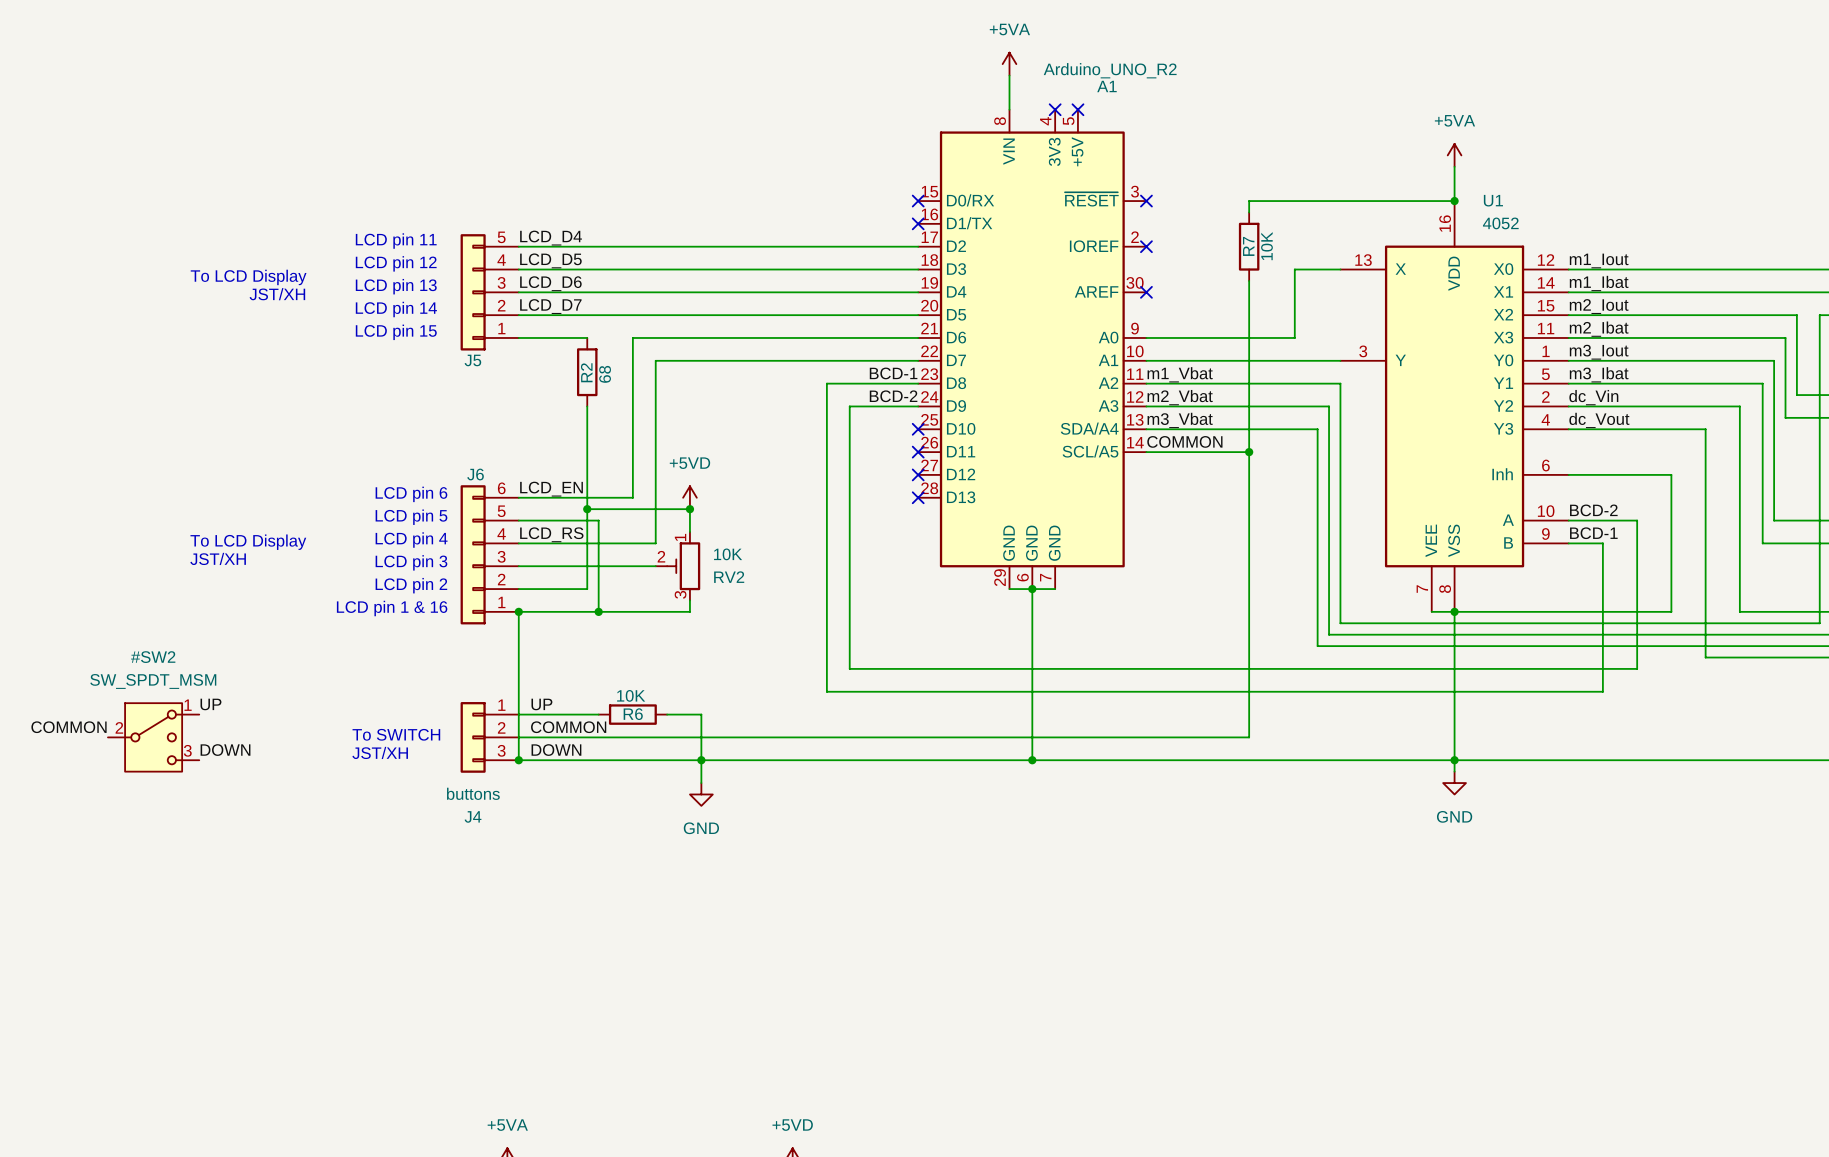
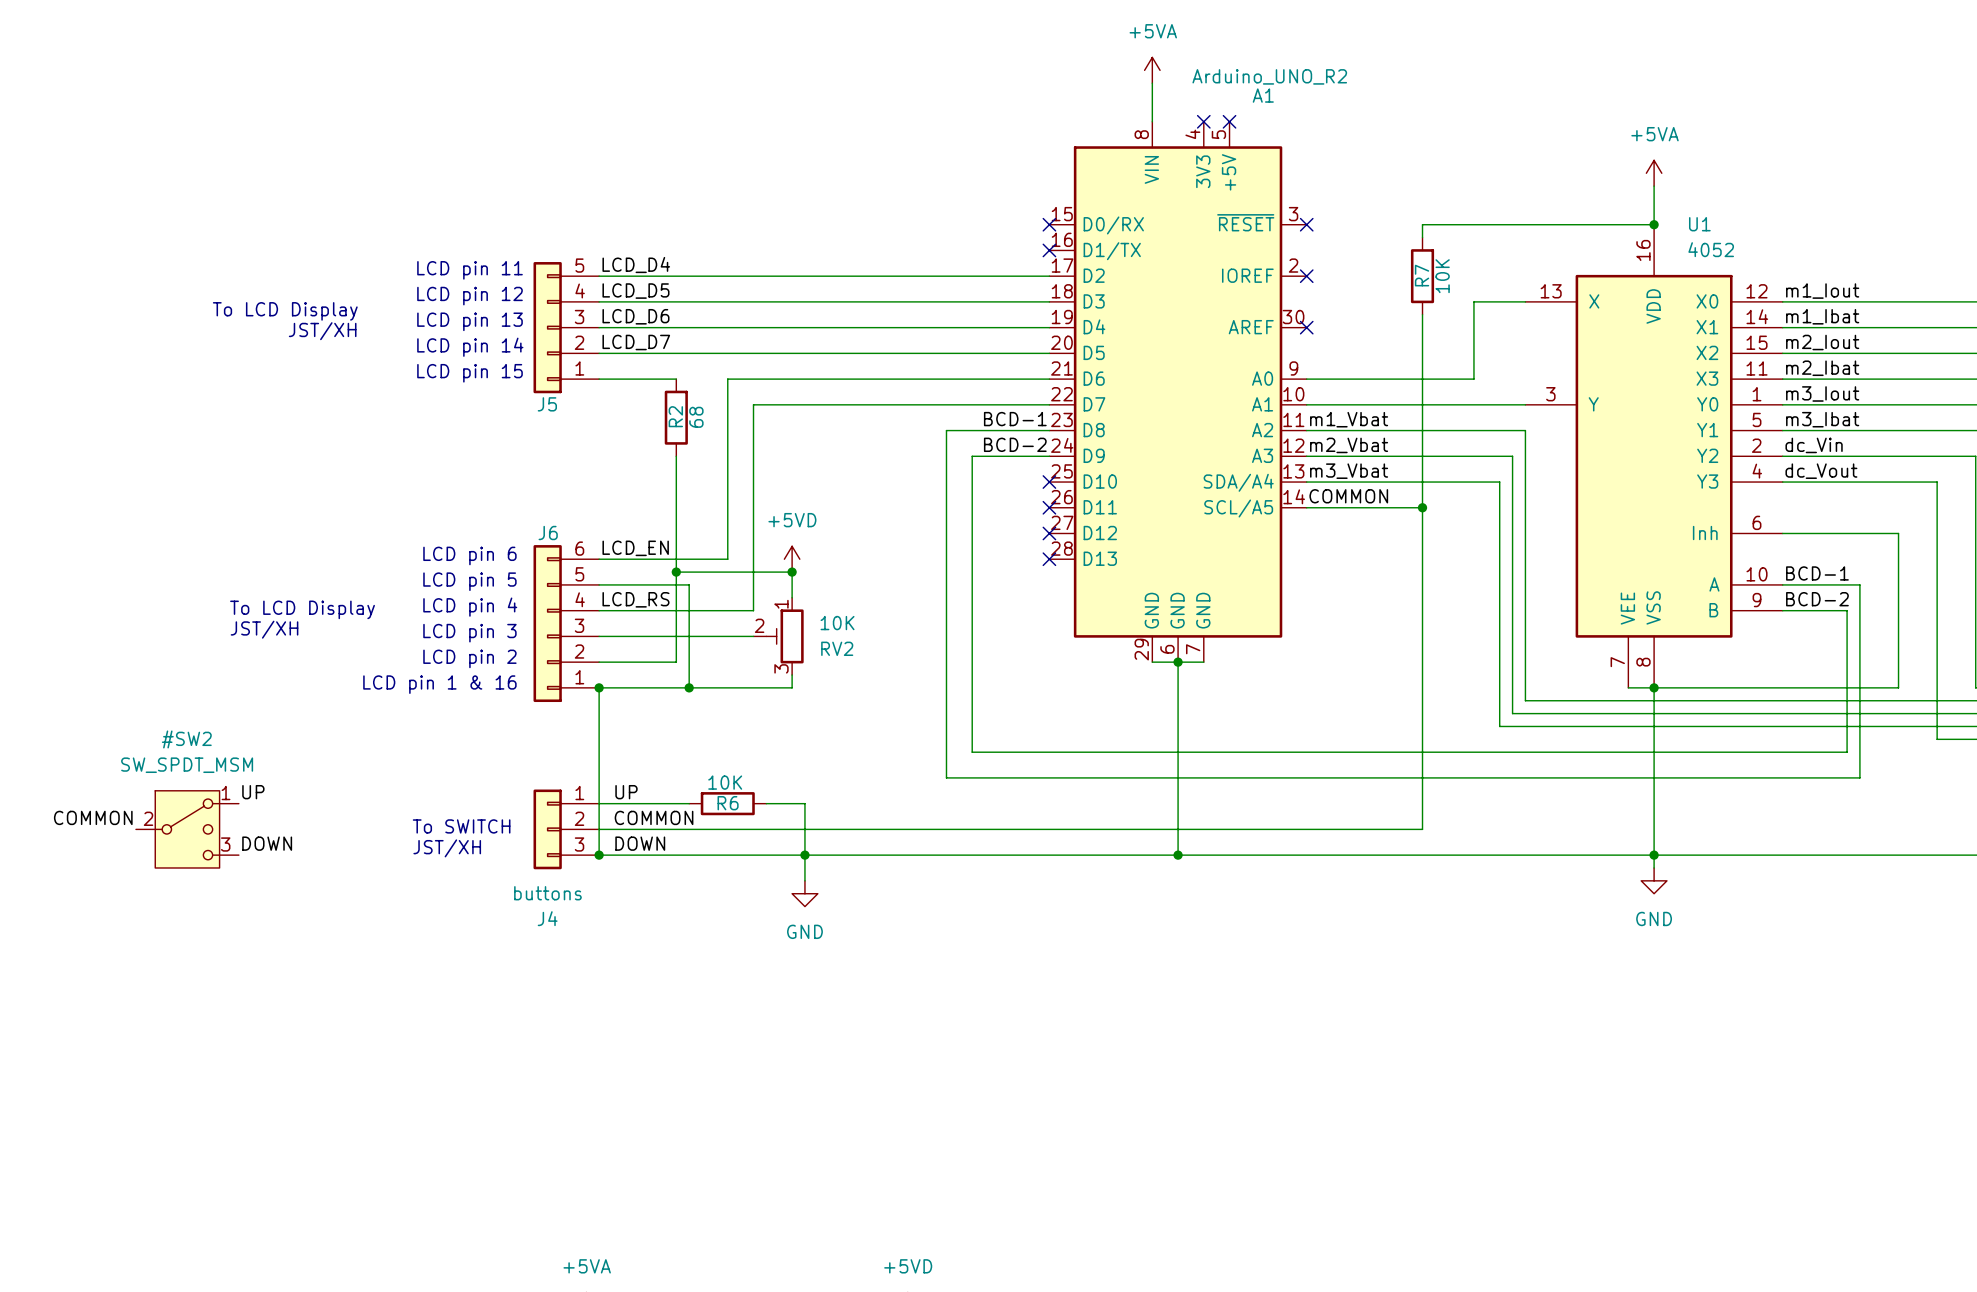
label: BCD-2 (1593, 510) -> BCD-1 (1817, 573)
label: BCD-1 (1593, 533) -> BCD-2 (1817, 599)
wire: (1602, 543) (1602, 691) -> (1821, 610) (1847, 610) (1847, 752)
wire: (1625, 668) (1637, 668) -> (1821, 777) (1859, 777) (1859, 752)

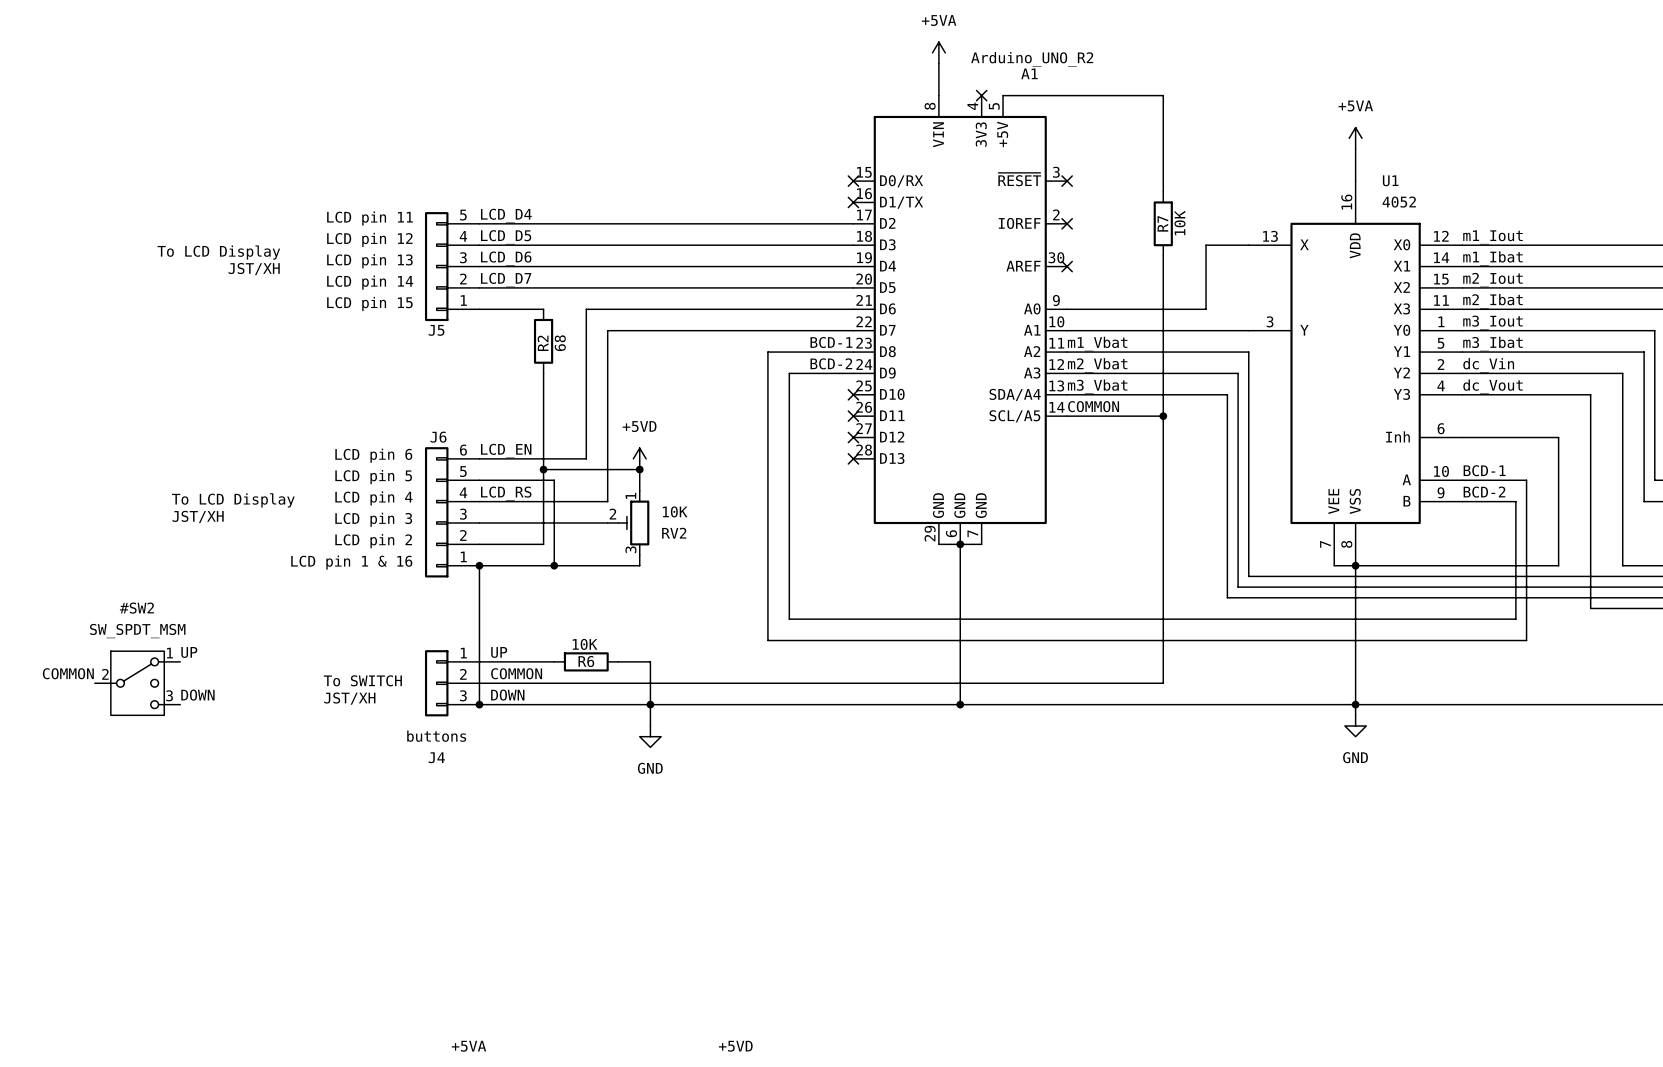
no-connect mark: (1229, 121) -> none
wire: (1422, 224) (1654, 224) -> (1163, 181) (1163, 95) (1003, 95)
junction: (1654, 224) -> none

